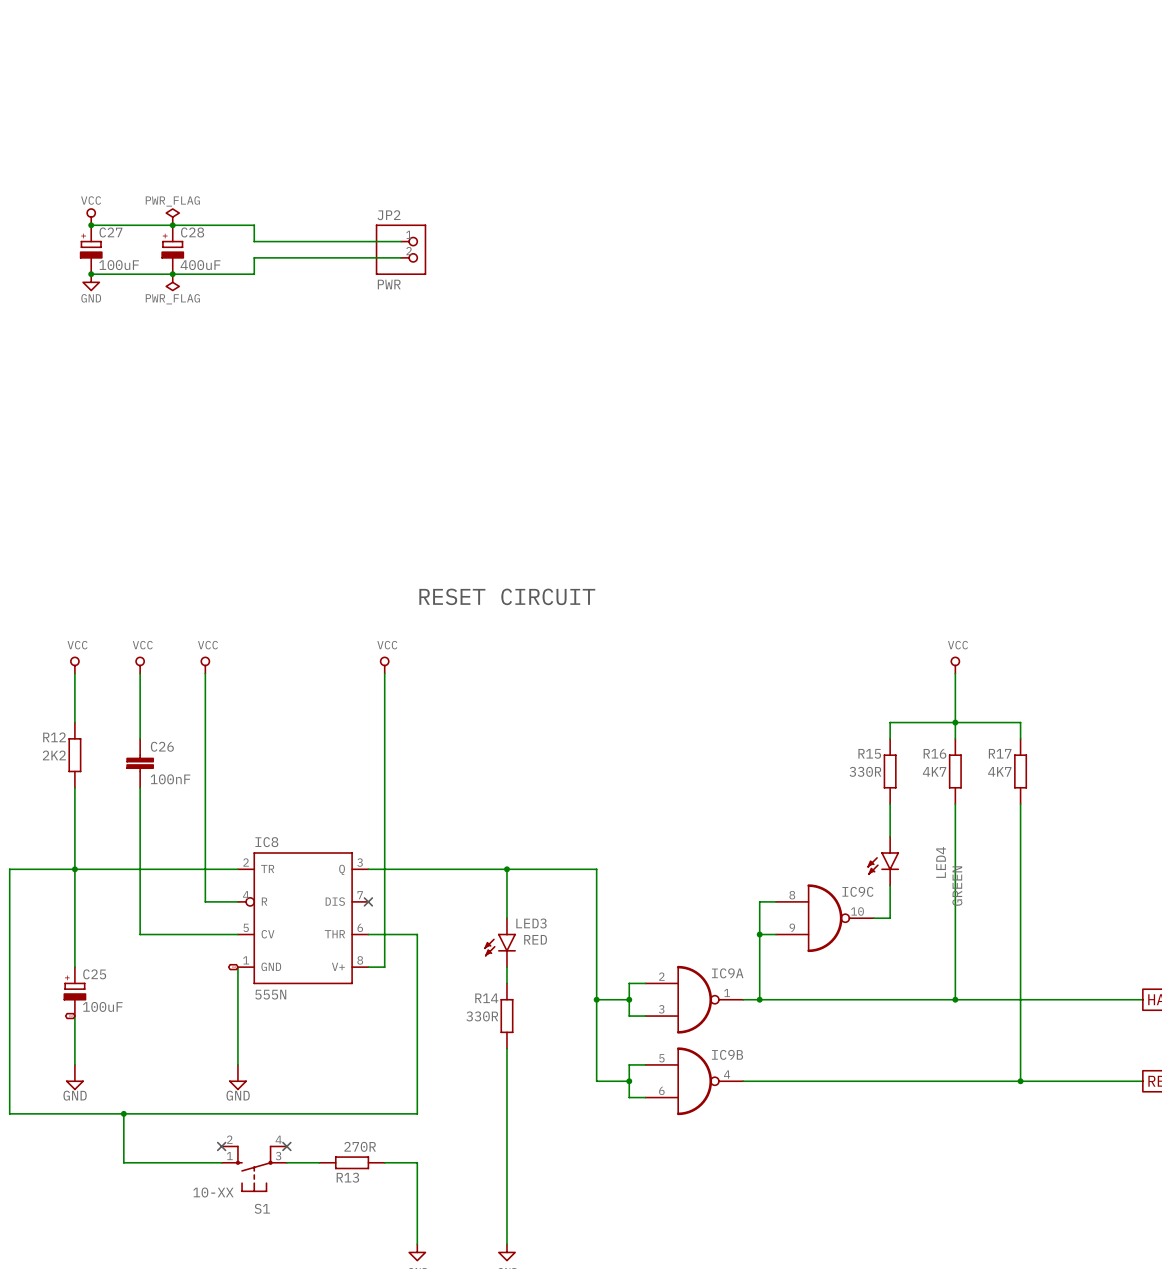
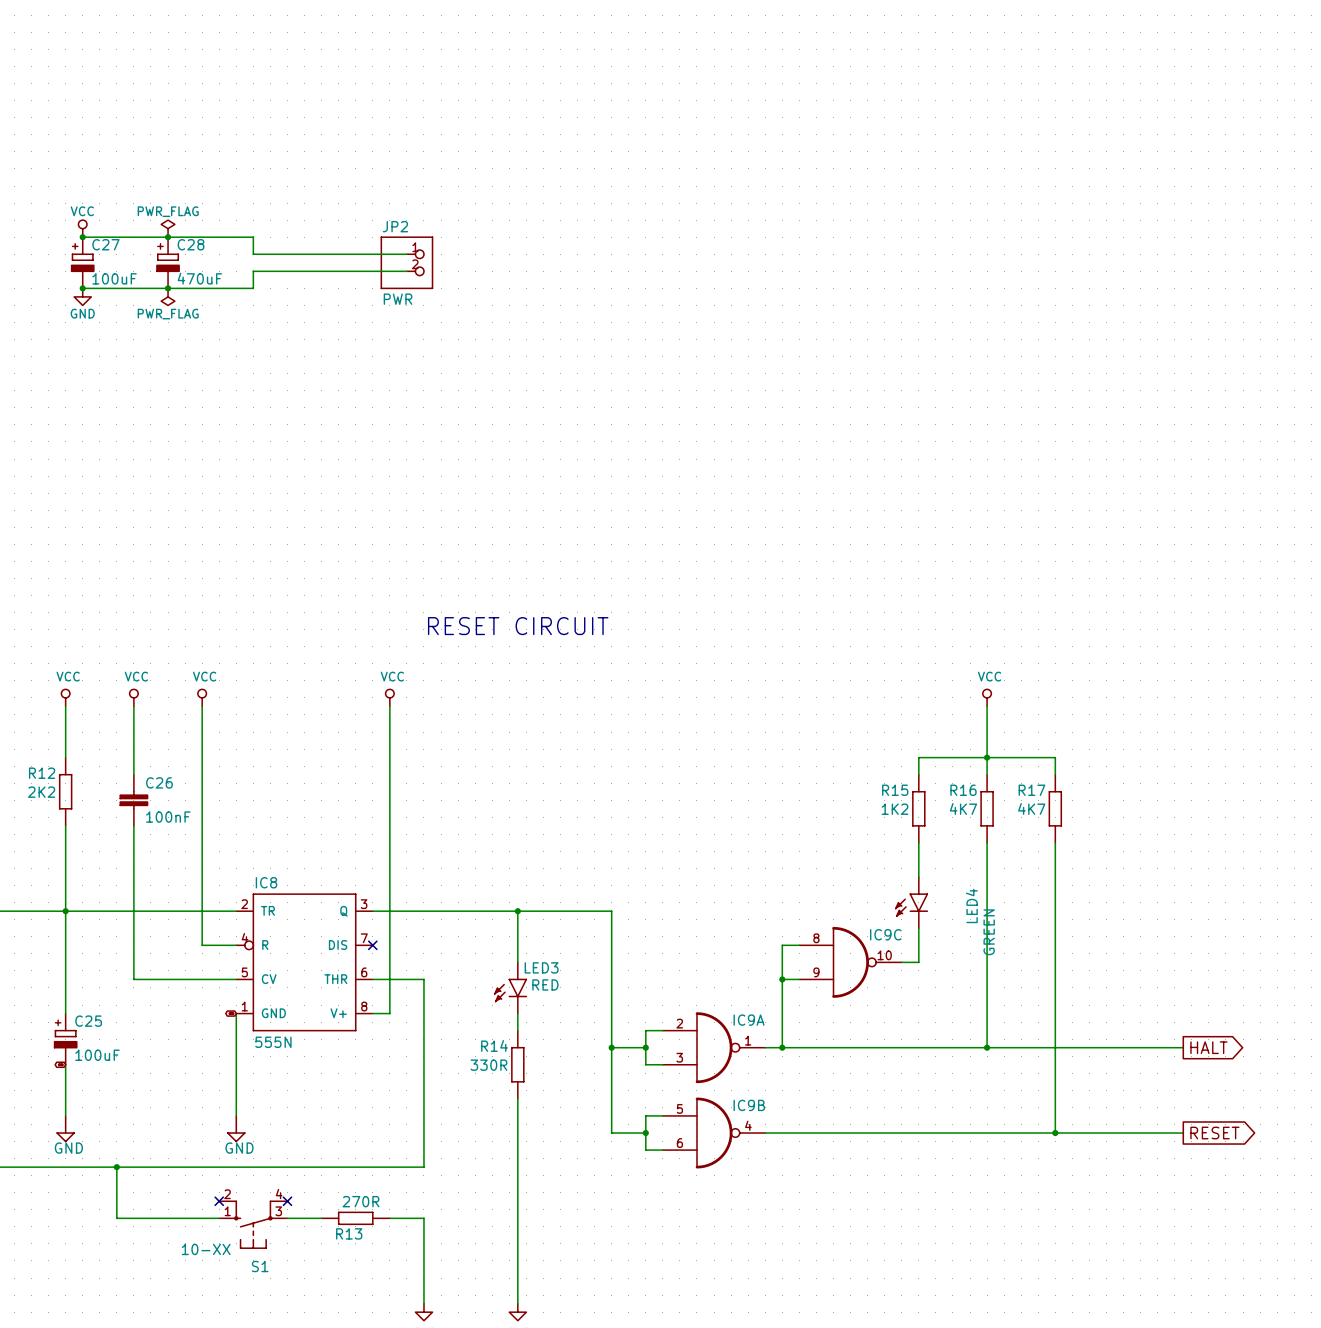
C28 value: 400uF (200, 265) -> 470uF (199, 278)
R15 value: 330R (865, 771) -> 1K2 (894, 809)

